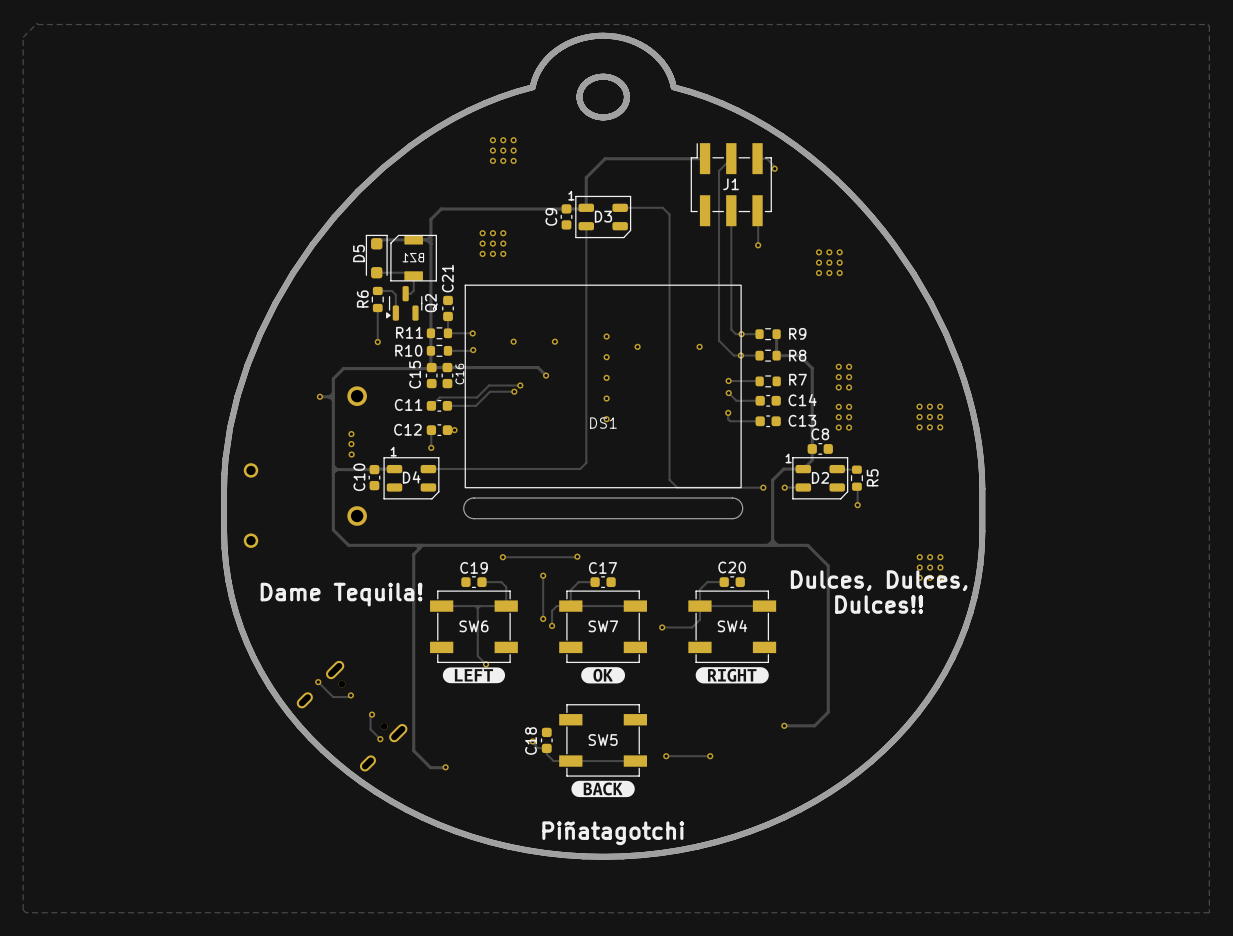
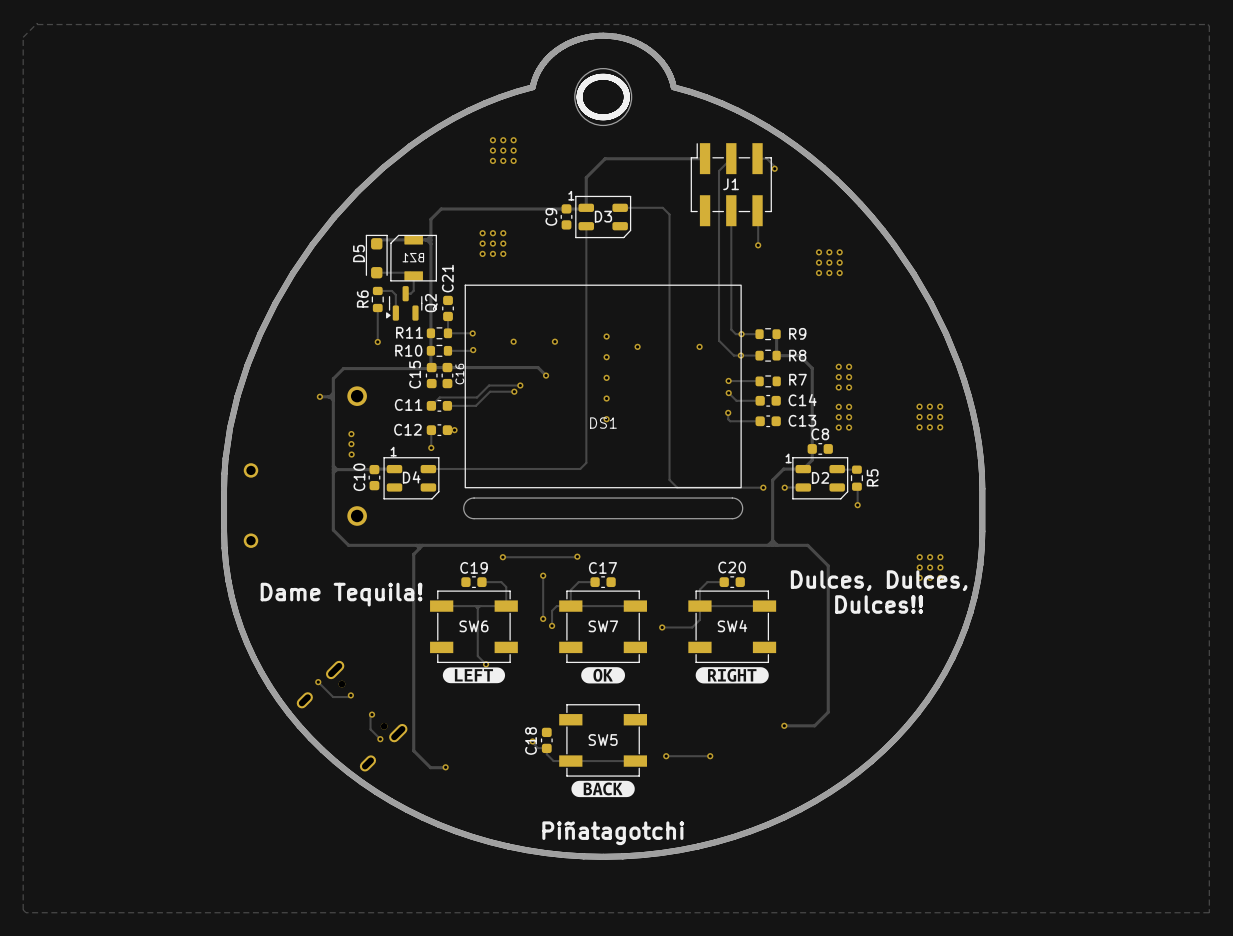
round board edge: none -> [574, 68, 633, 126]
board edge: (601, 76) (592, 78) (584, 84) (580, 90) (579, 99) (582, 106) (588, 112) (596, 116) (605, 117) (614, 114) (621, 109) (625, 103) (626, 94) (624, 87) (618, 81) (601, 76) -> none

